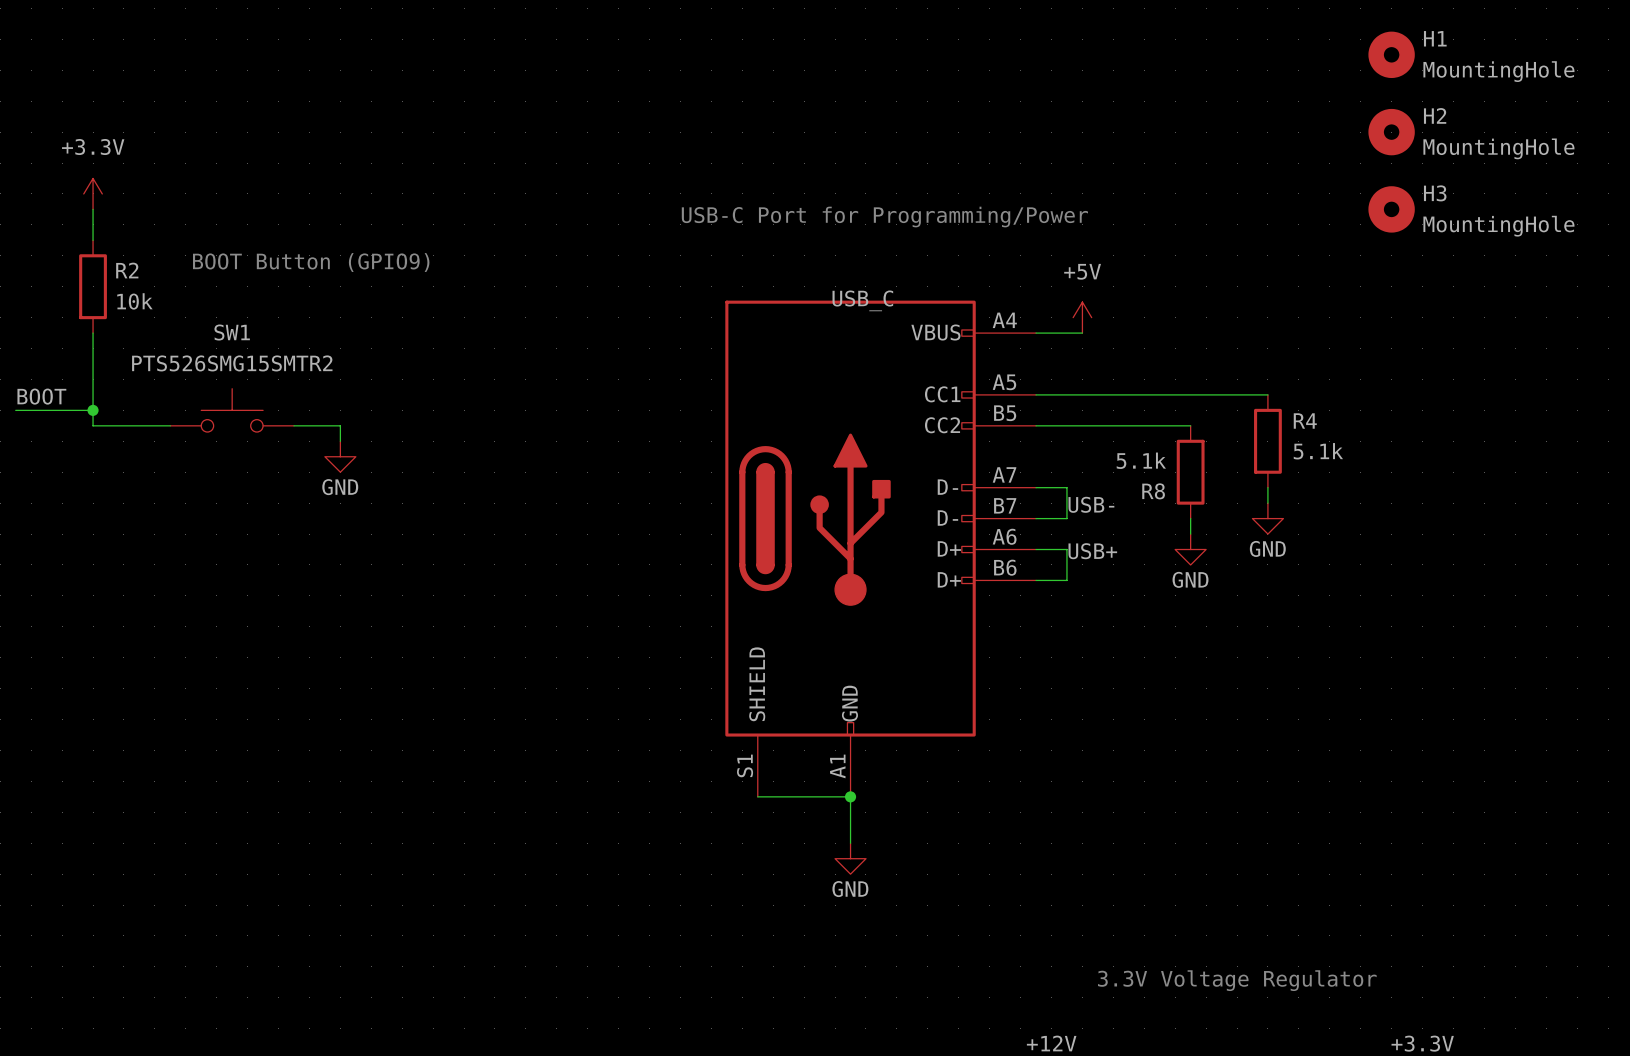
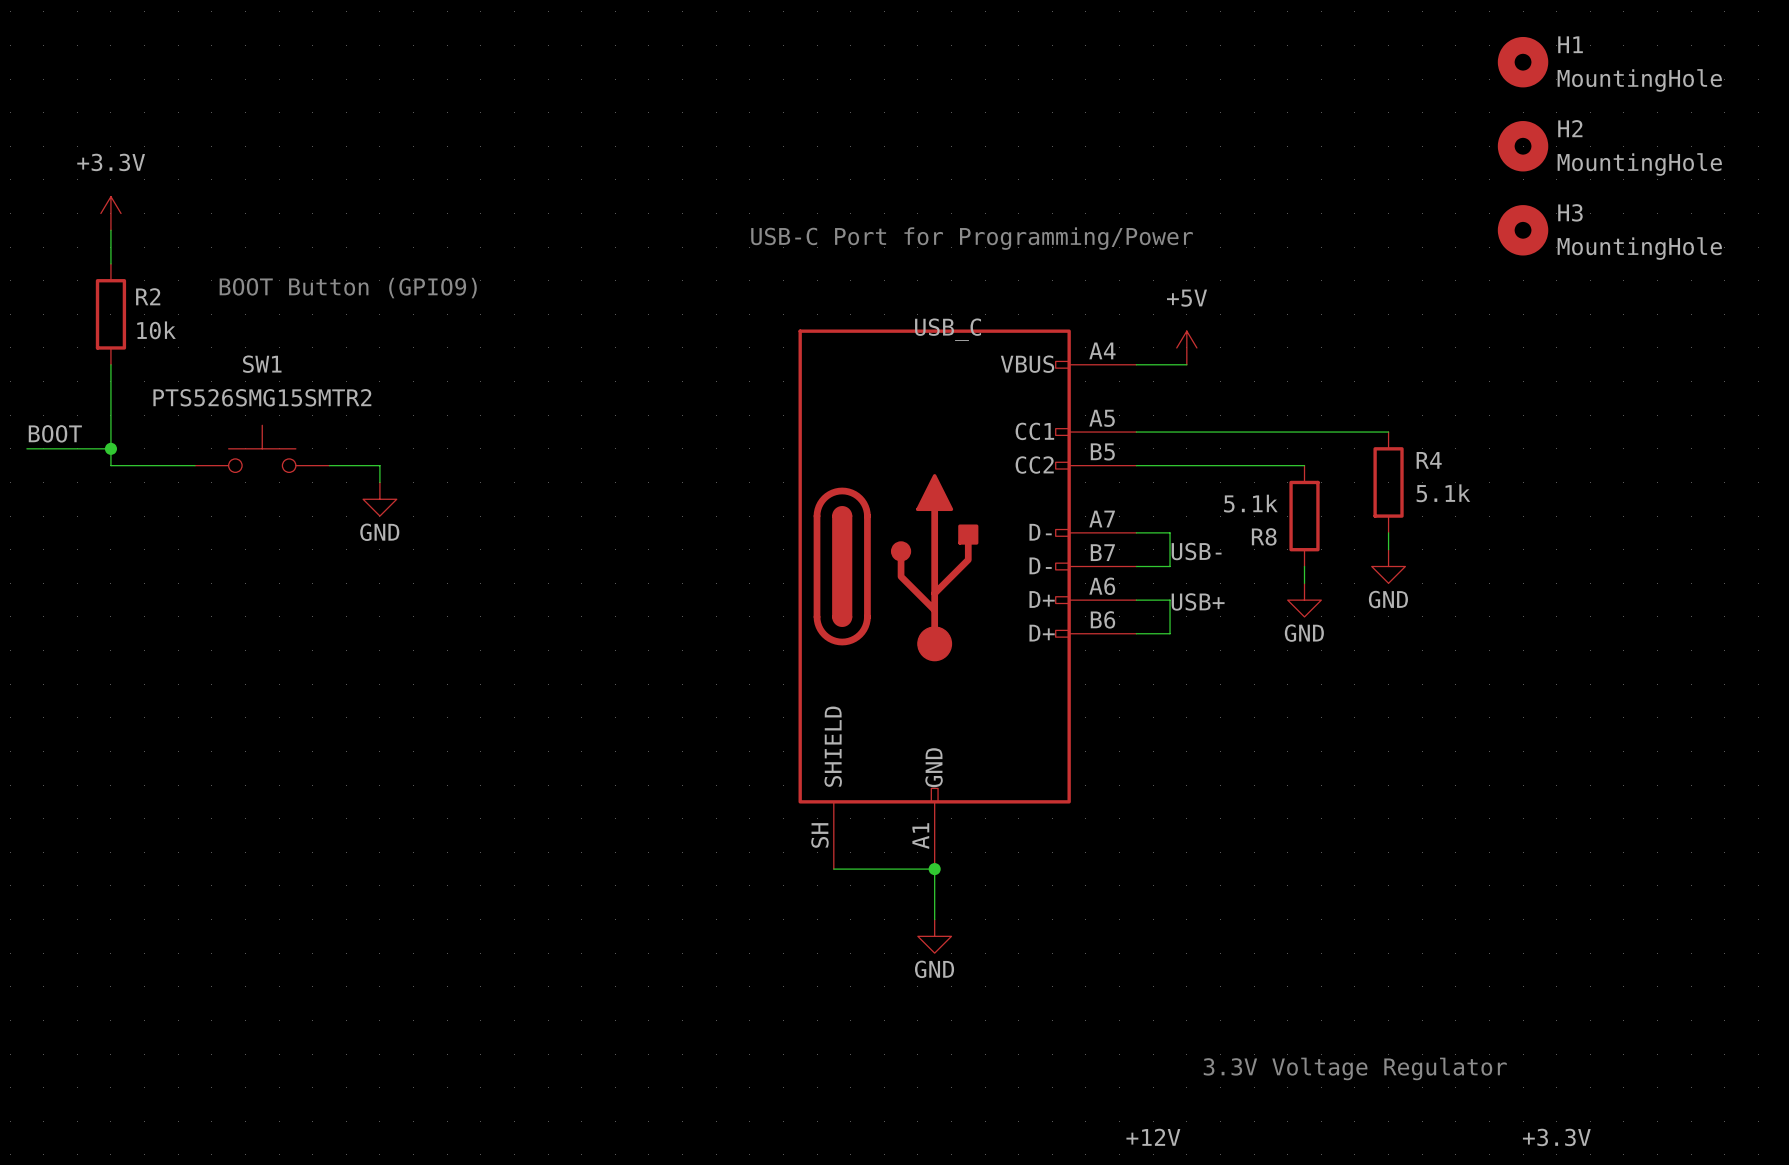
part pin number: S1 (745, 765) -> SH (819, 835)

